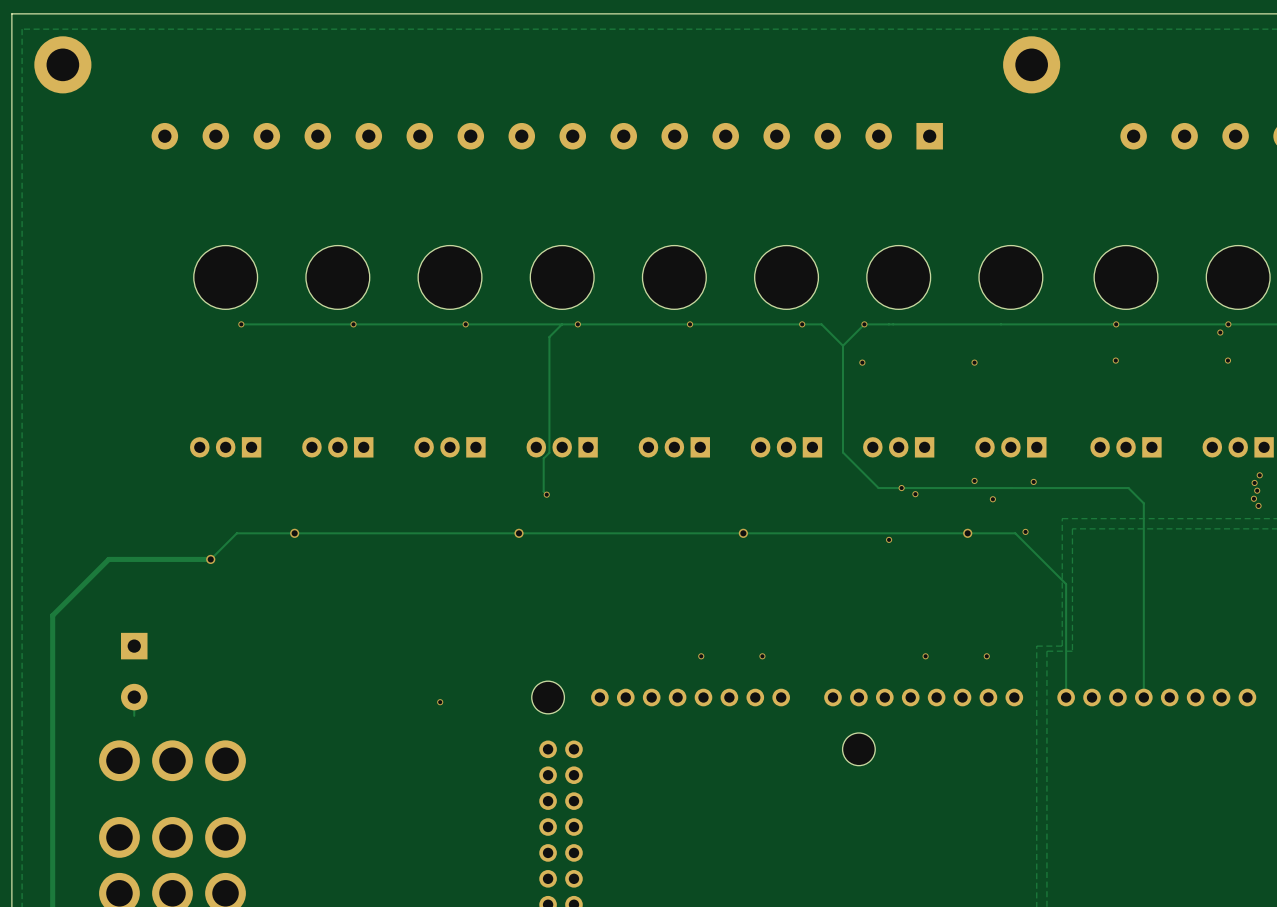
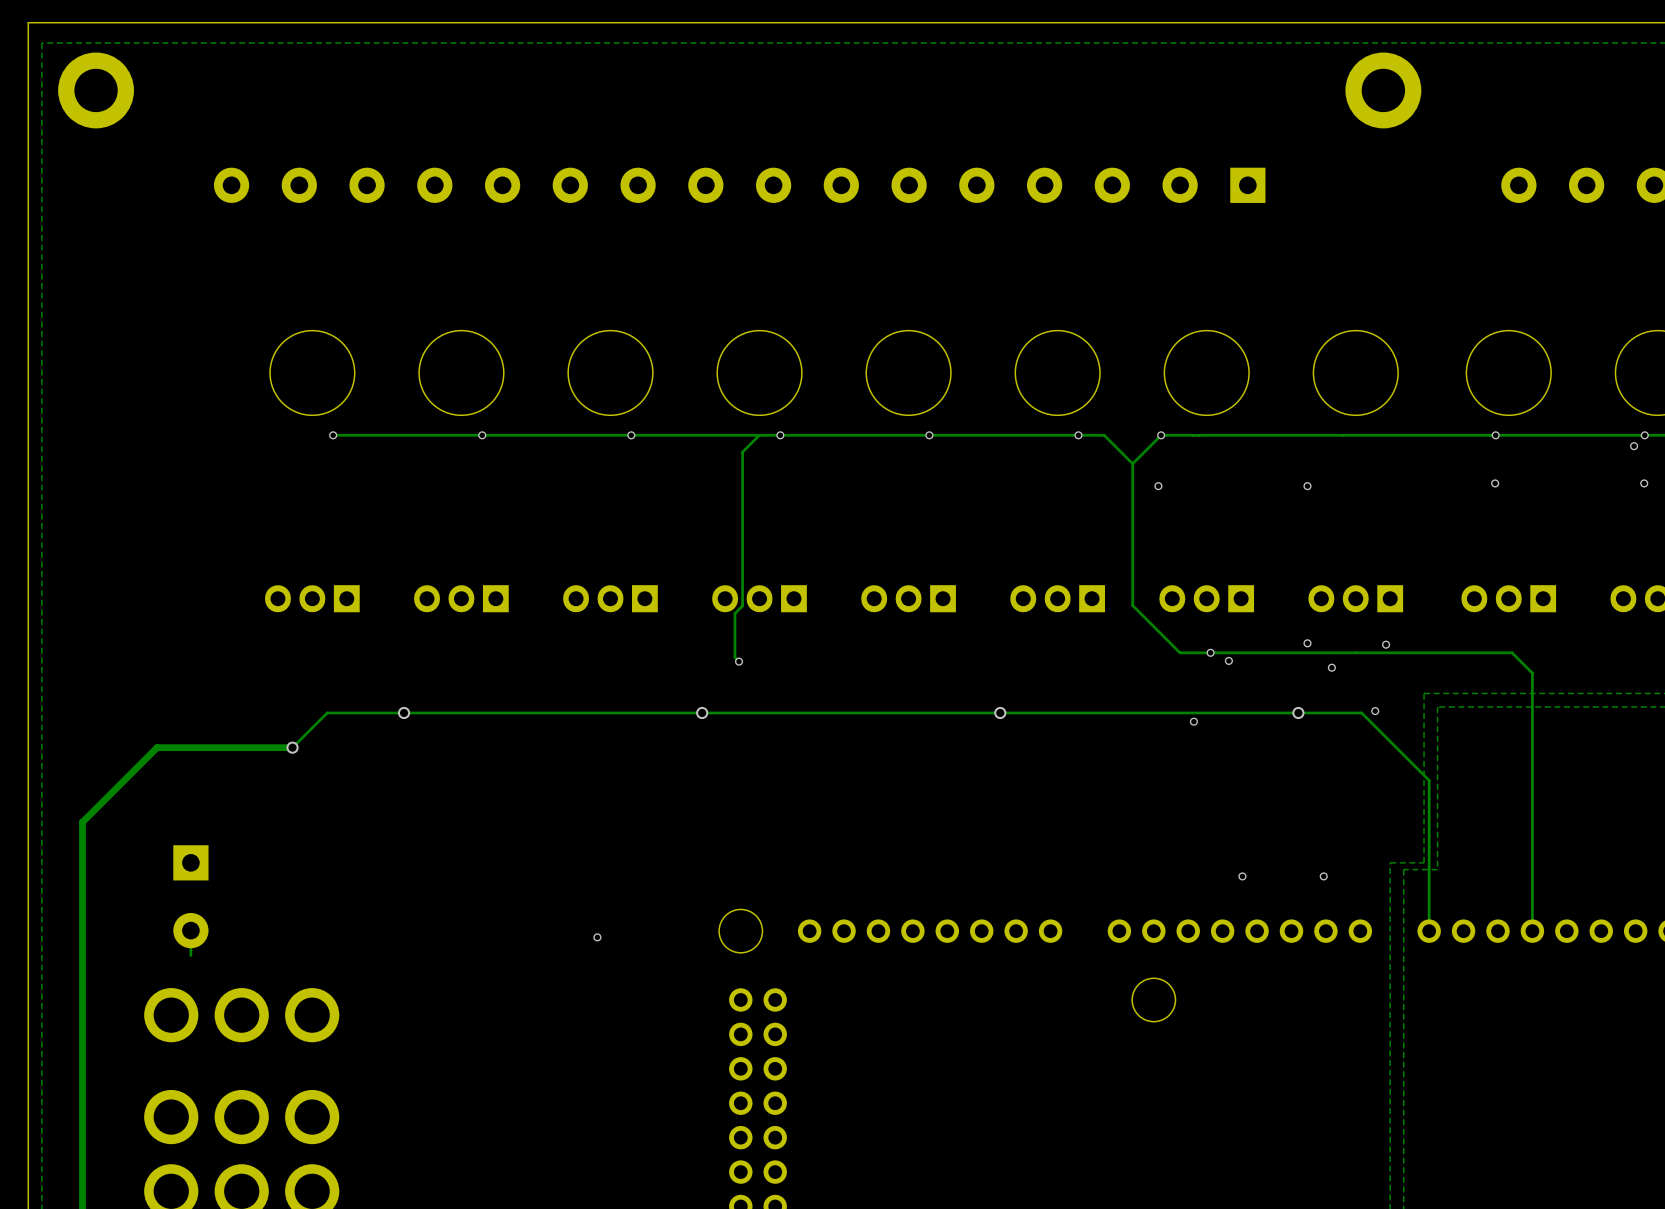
via: (701, 656) -> none
via: (762, 656) -> none

